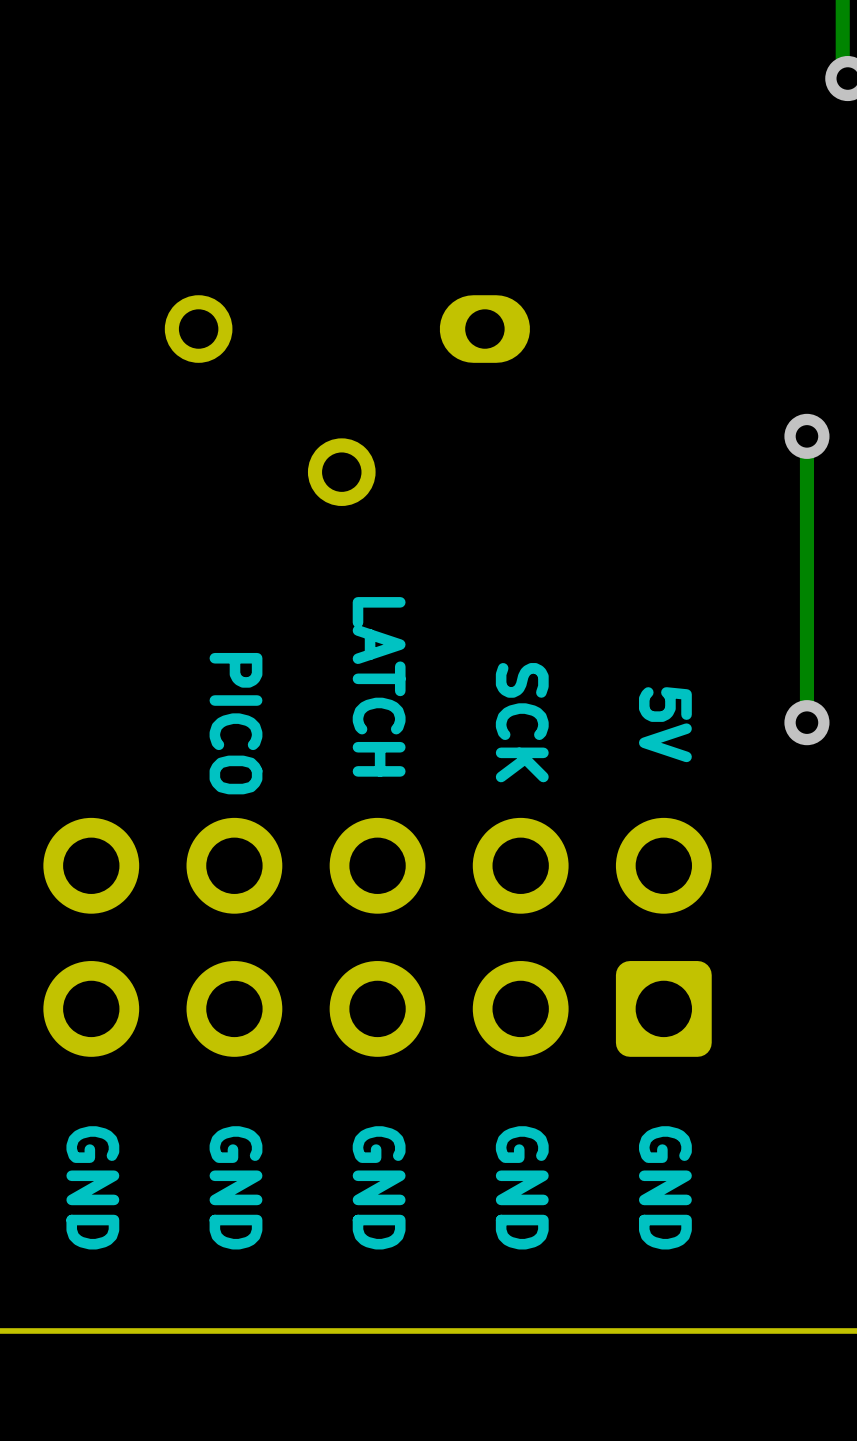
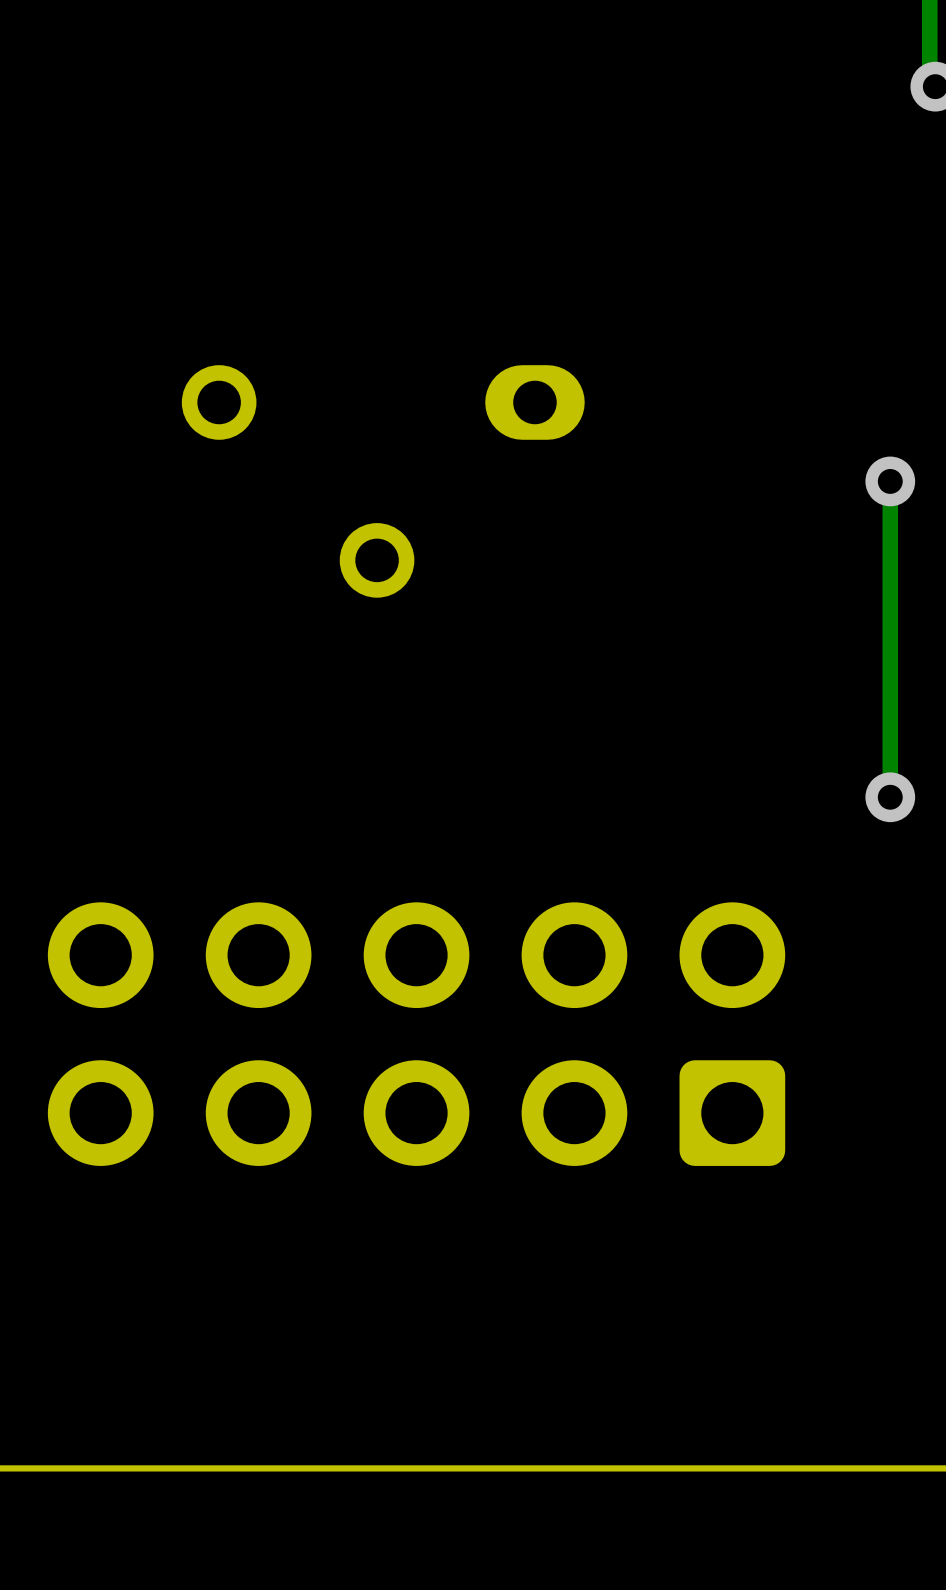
part position: (347, 400) -> (383, 481)
text: LATCH (379, 686) -> none
text: SCK (522, 722) -> none
text: PICO (235, 723) -> none
text: 5V (665, 724) -> none
text: GND (92, 1187) -> none
text: GND (235, 1187) -> none
text: GND (379, 1187) -> none
text: GND (522, 1187) -> none
text: GND (665, 1187) -> none

